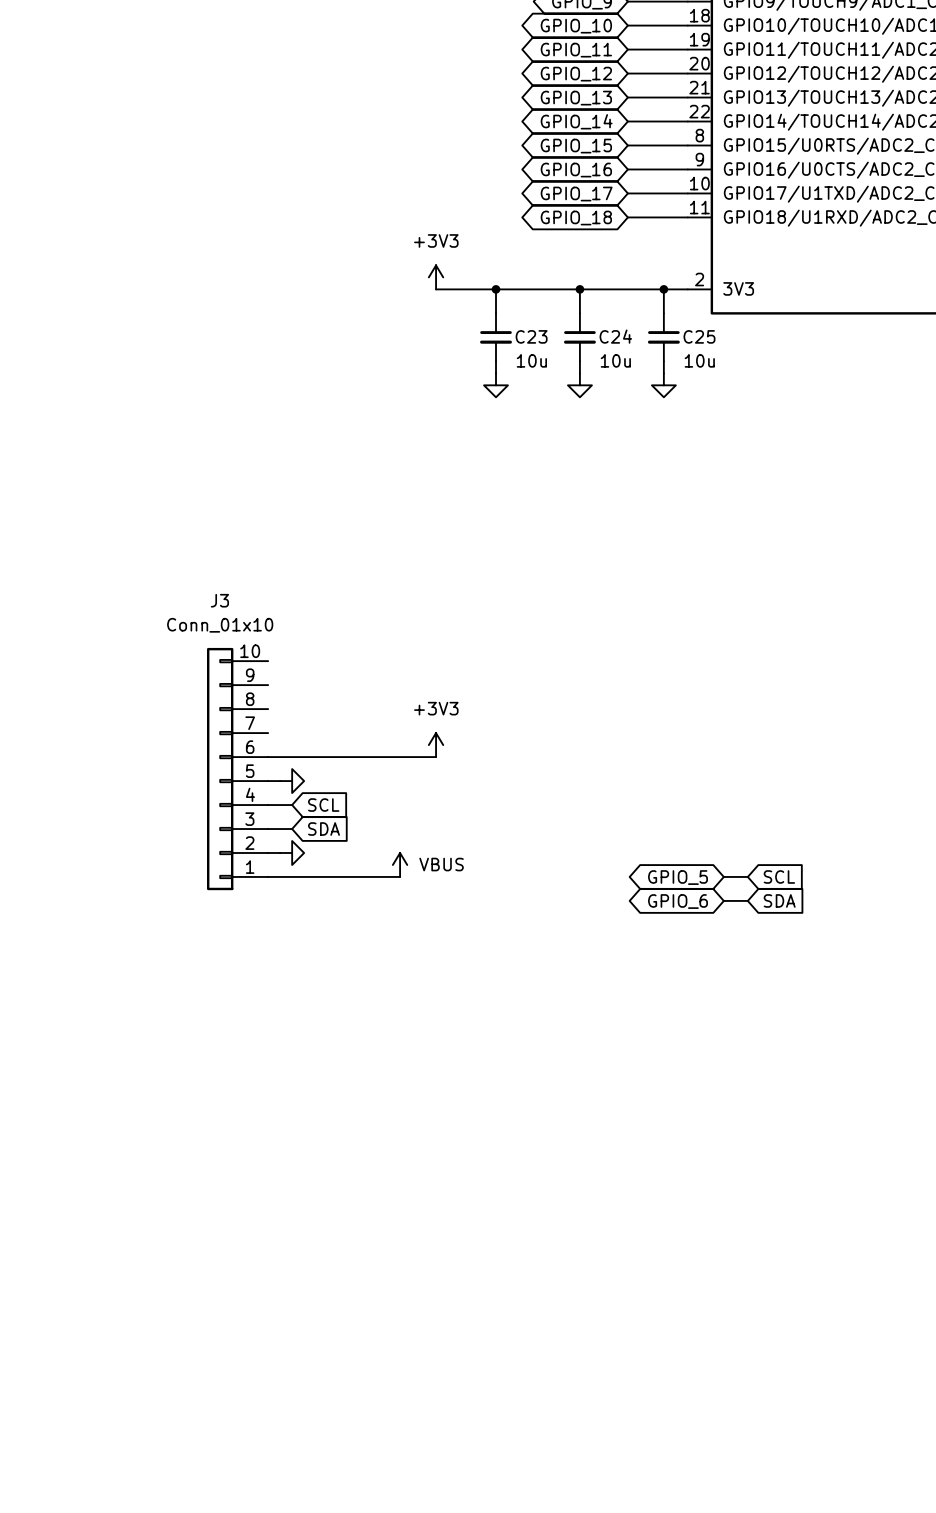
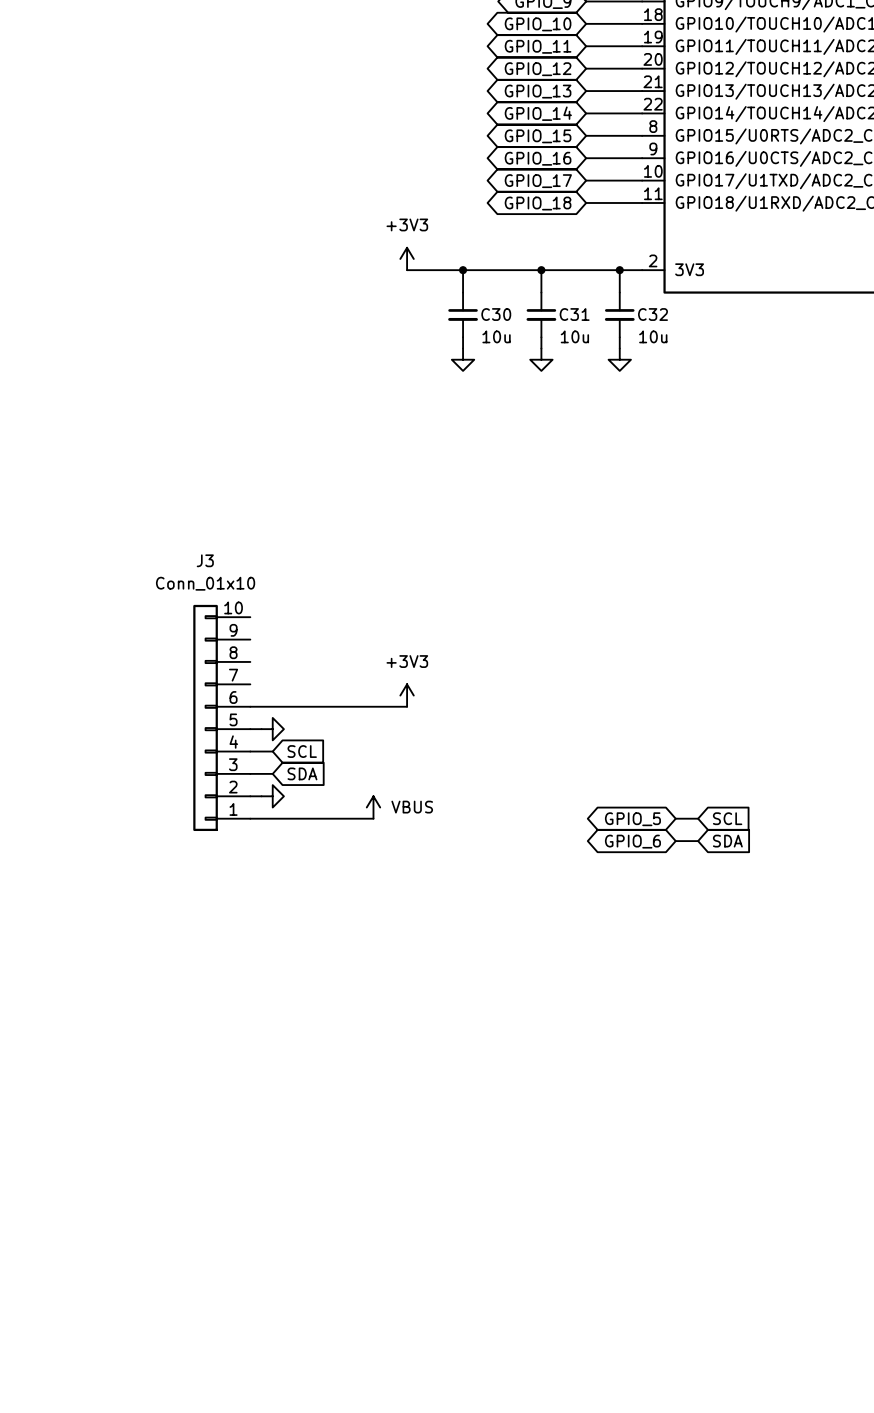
C23 name: C23 (531, 336) -> C30 (496, 314)
C24 name: C24 (615, 336) -> C31 (574, 314)
C25 name: C25 (699, 336) -> C32 (653, 314)

